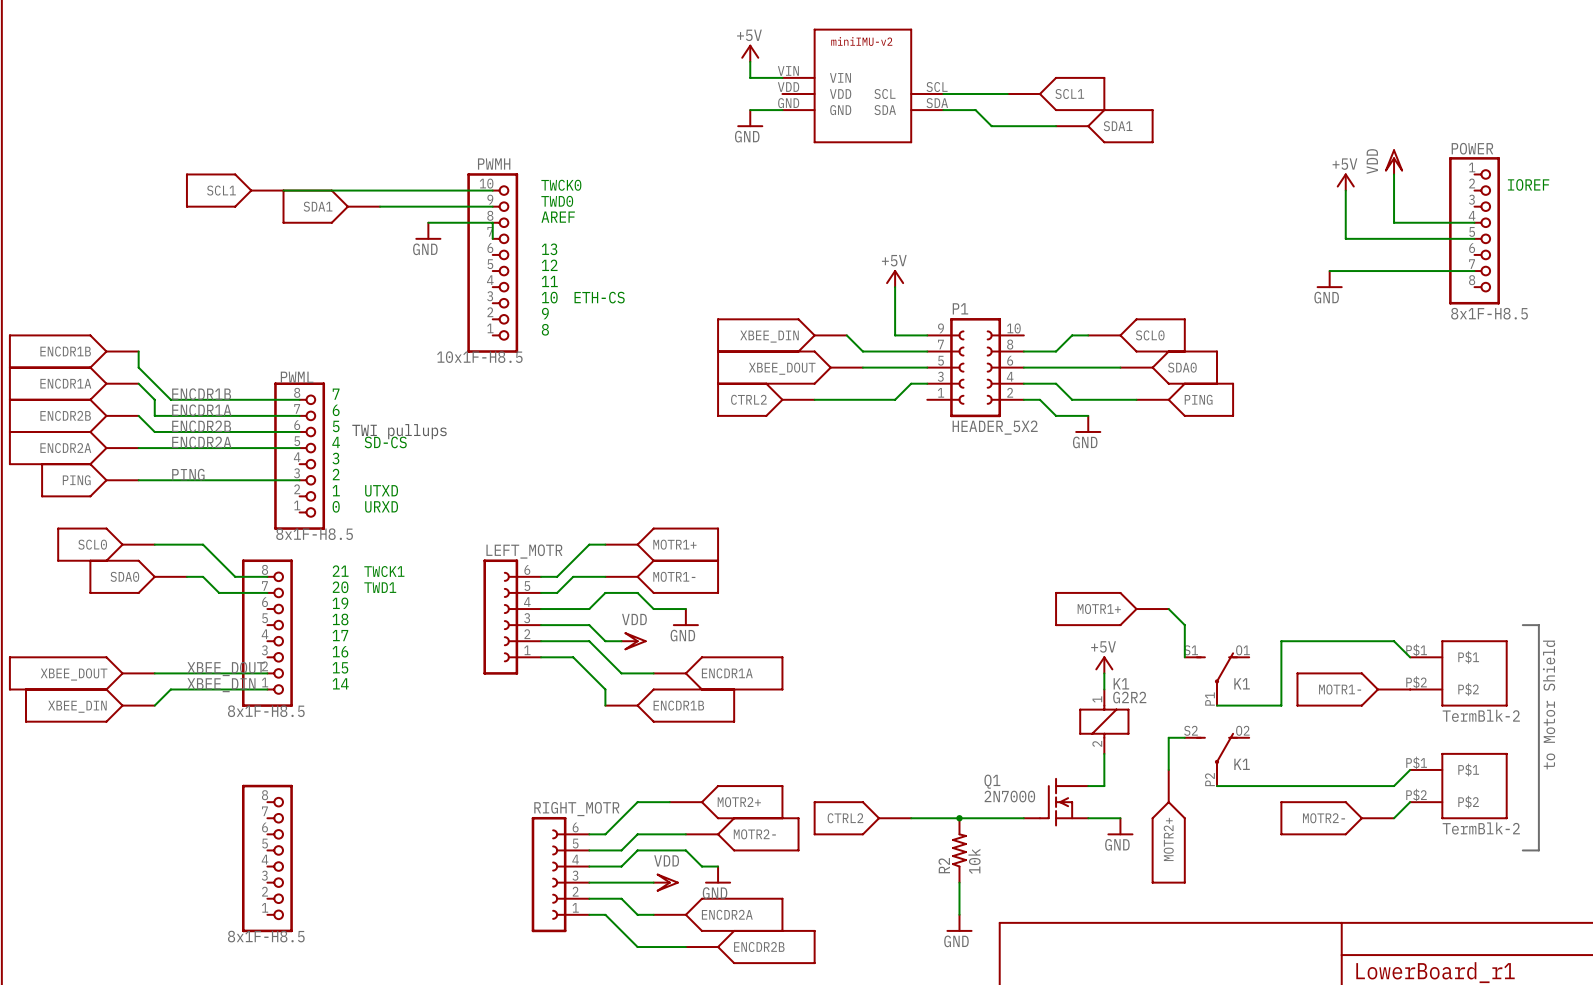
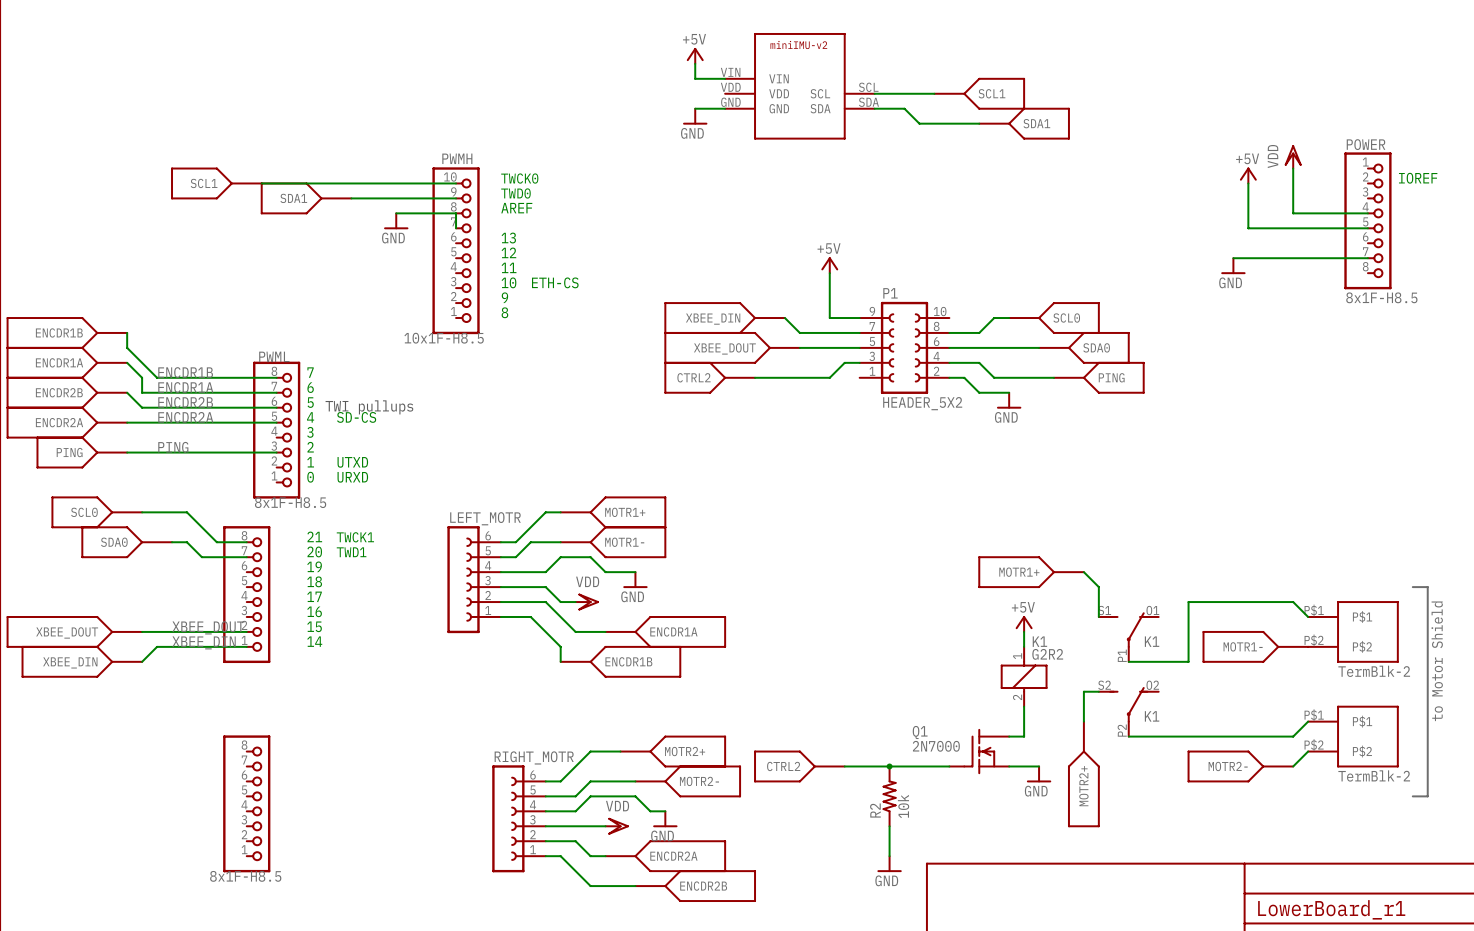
part value: 8x1F-H8.5 (266, 711) -> none

